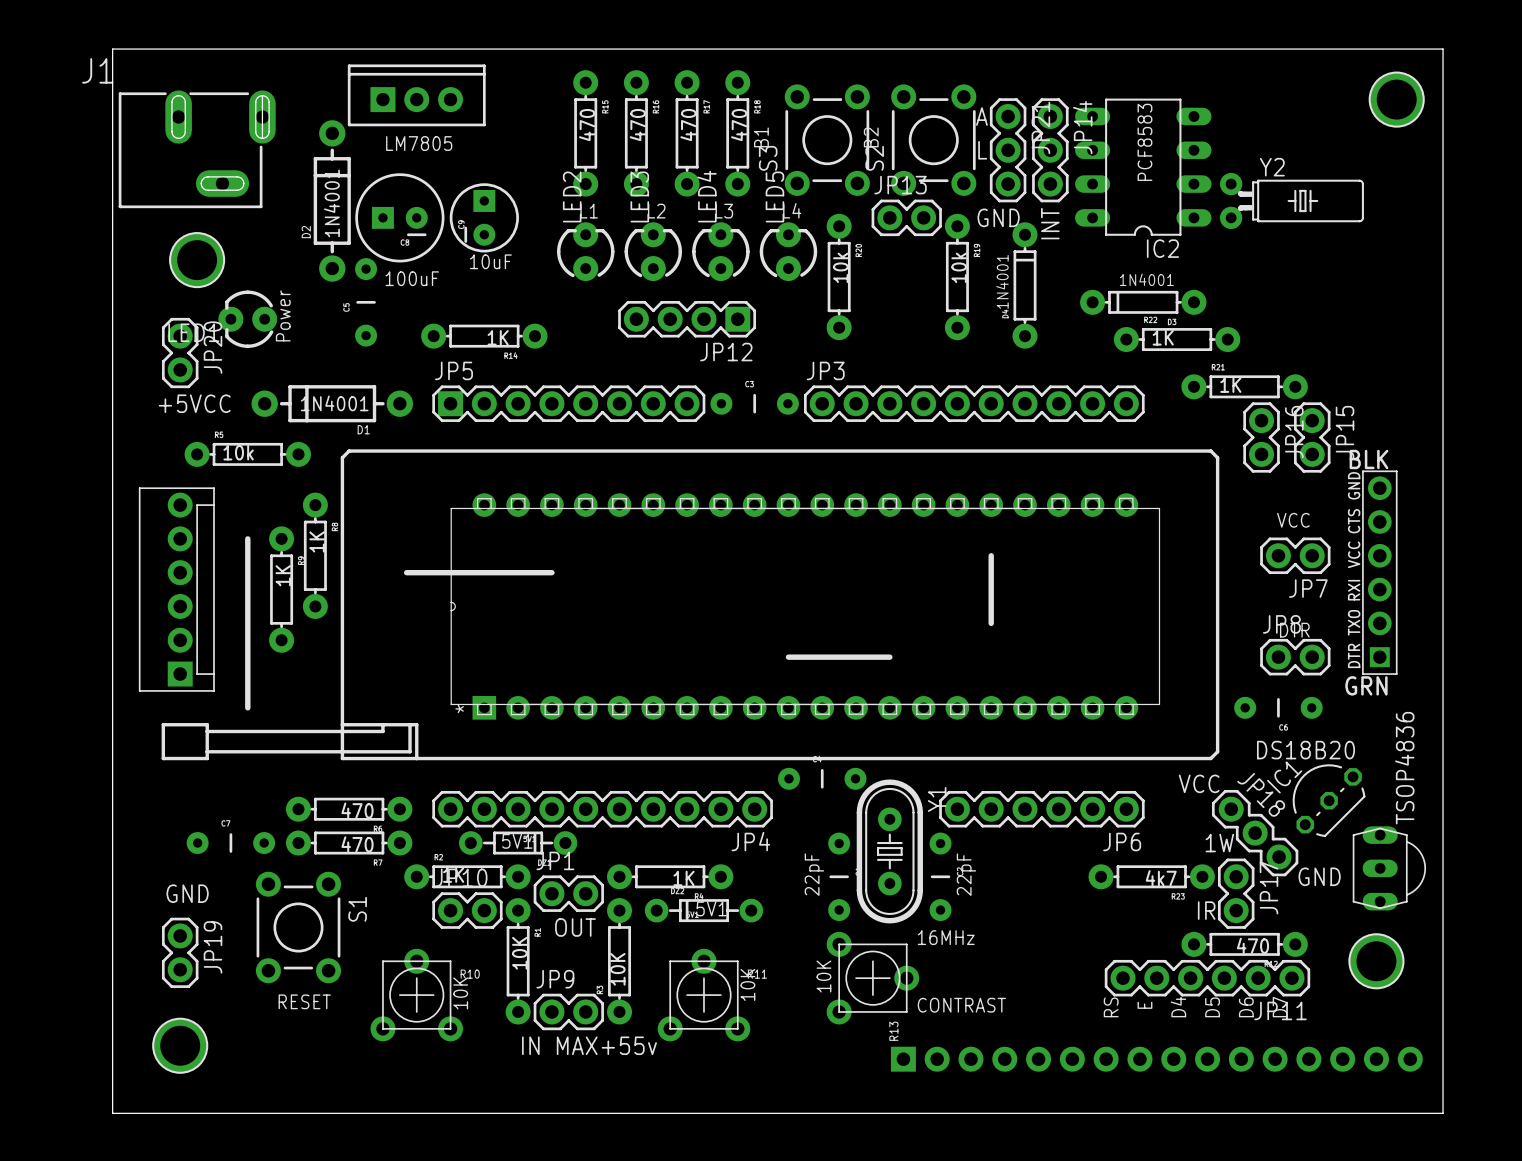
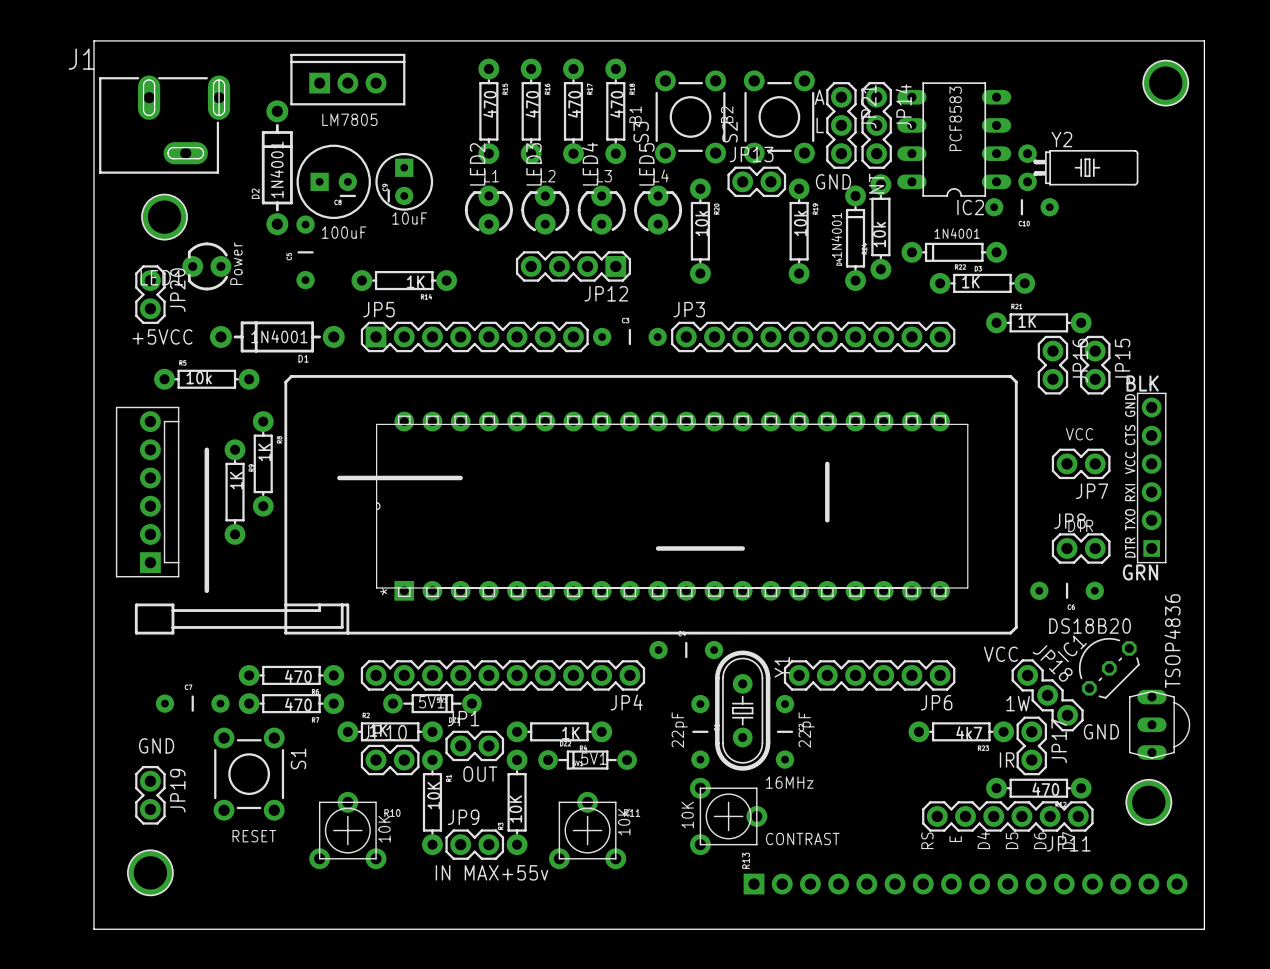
part: none -> (1021, 207)
part: none -> 10k (880, 226)

